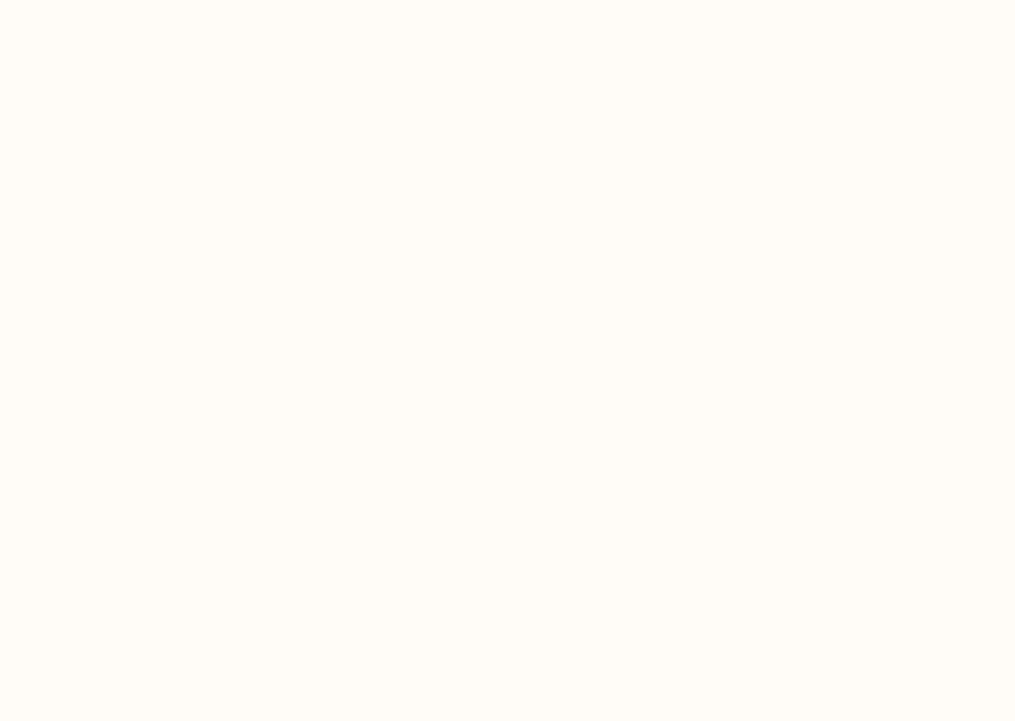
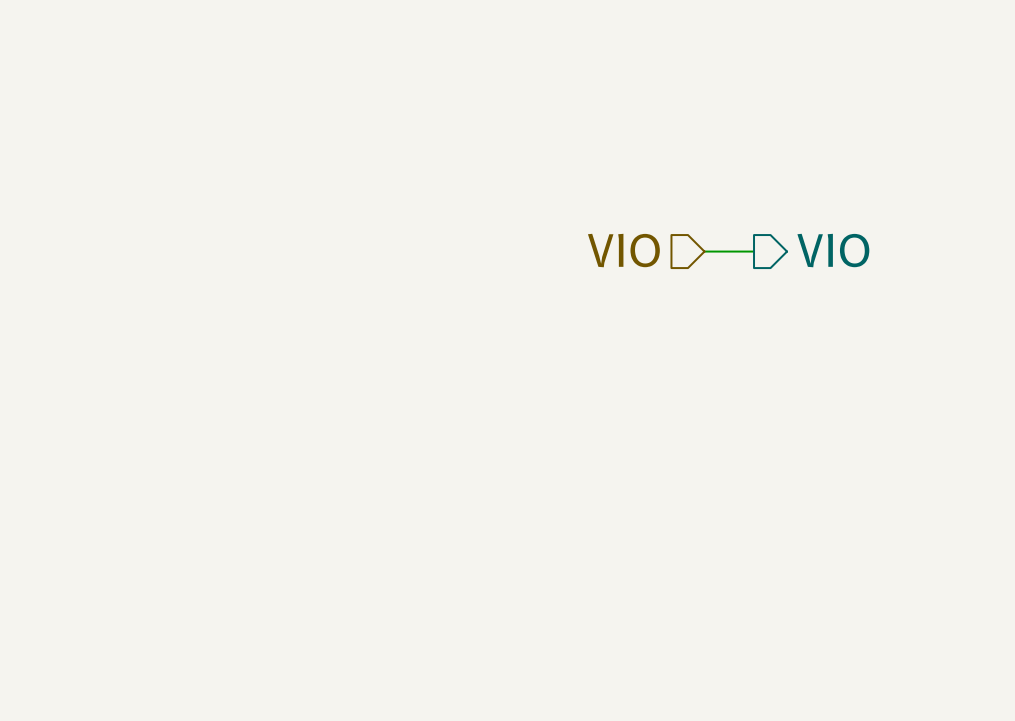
hierarchical label: none -> VIO (623, 250)
sheet pin: none -> VIO (833, 250)
wire: none -> (704, 251) (754, 251)

